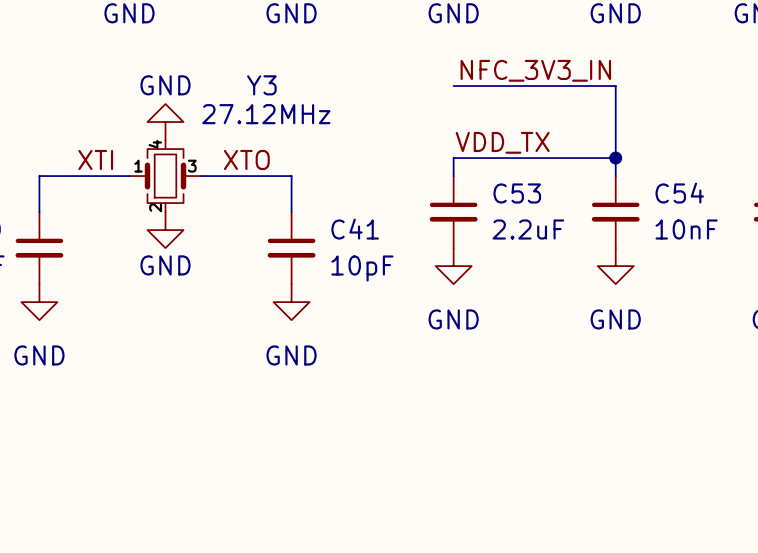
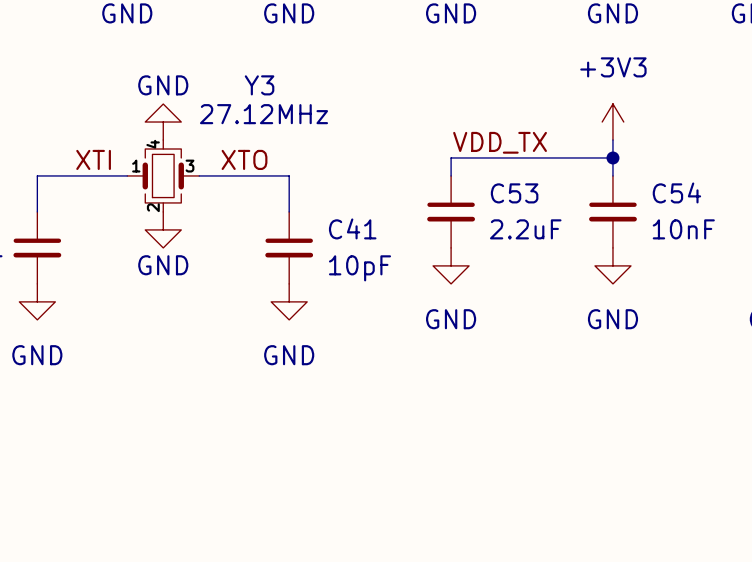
label: NFC_3V3_IN (535, 70) -> none
wire: (453, 86) (615, 86) (615, 140) -> none
power symbol: none -> +3V3 (612, 122)

